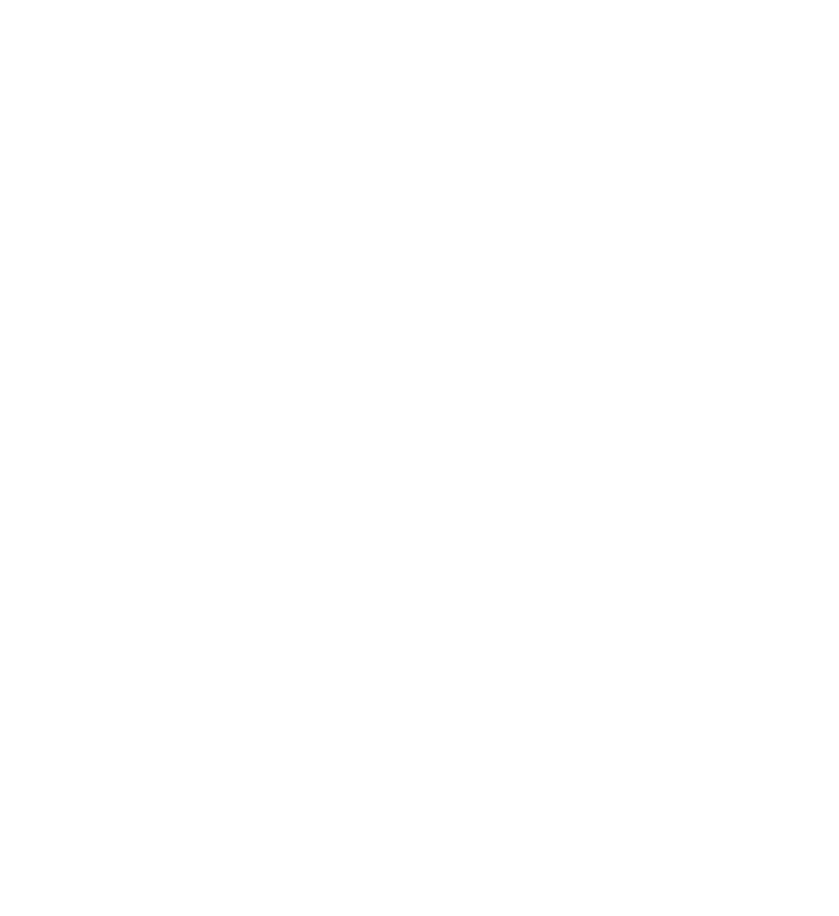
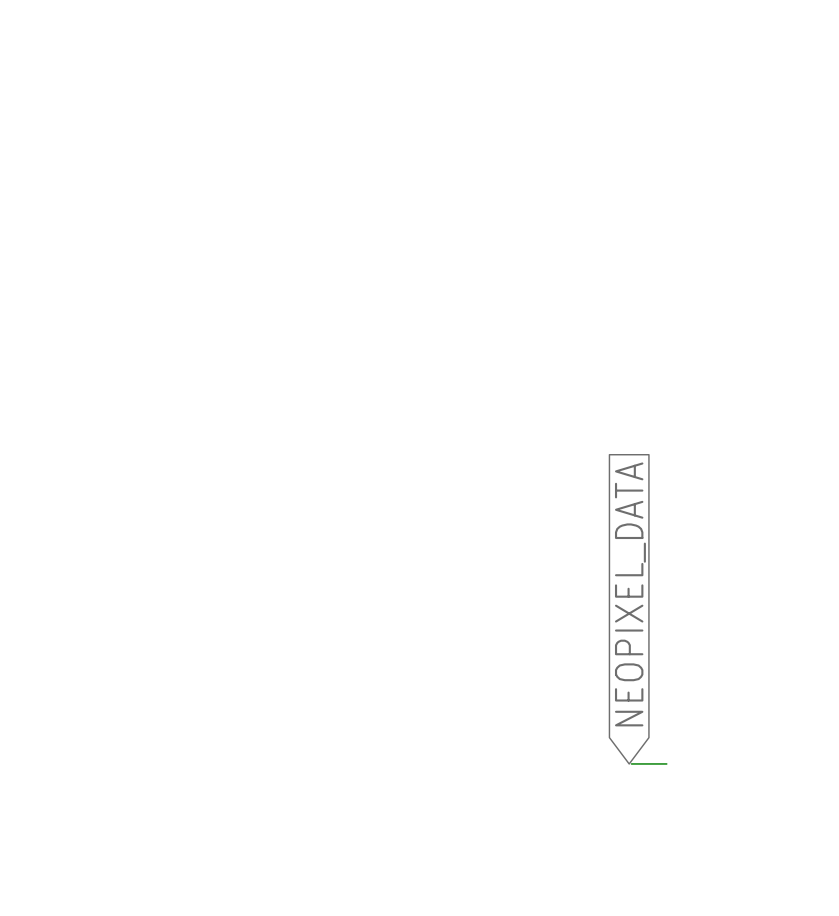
global label: none -> NEOPIXEL_DATA (630, 594)
wire: none -> (631, 763) (666, 763)

